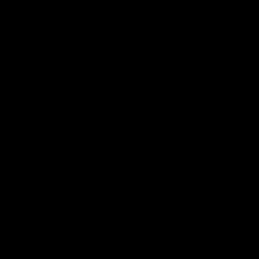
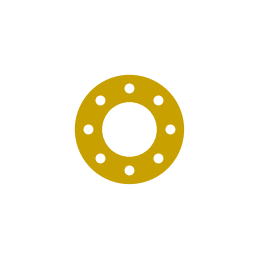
part: none -> (129, 129)

